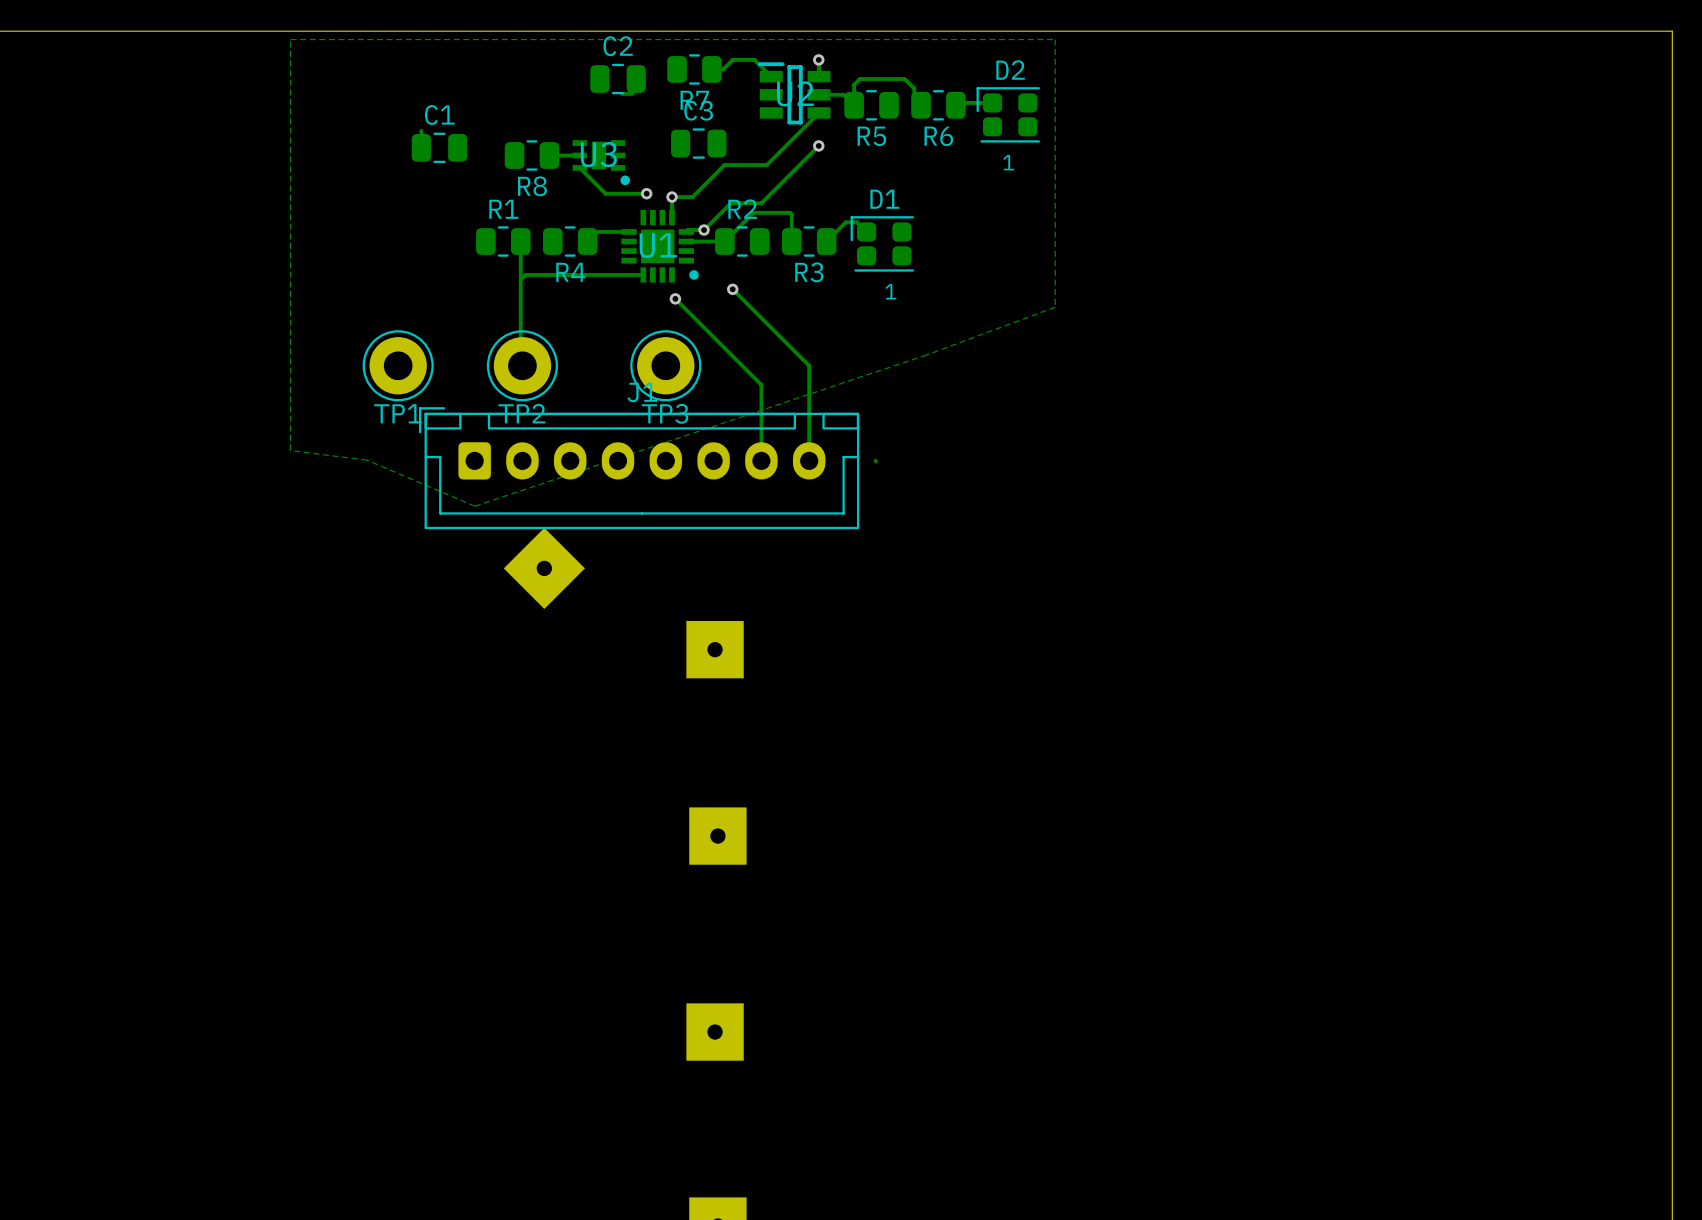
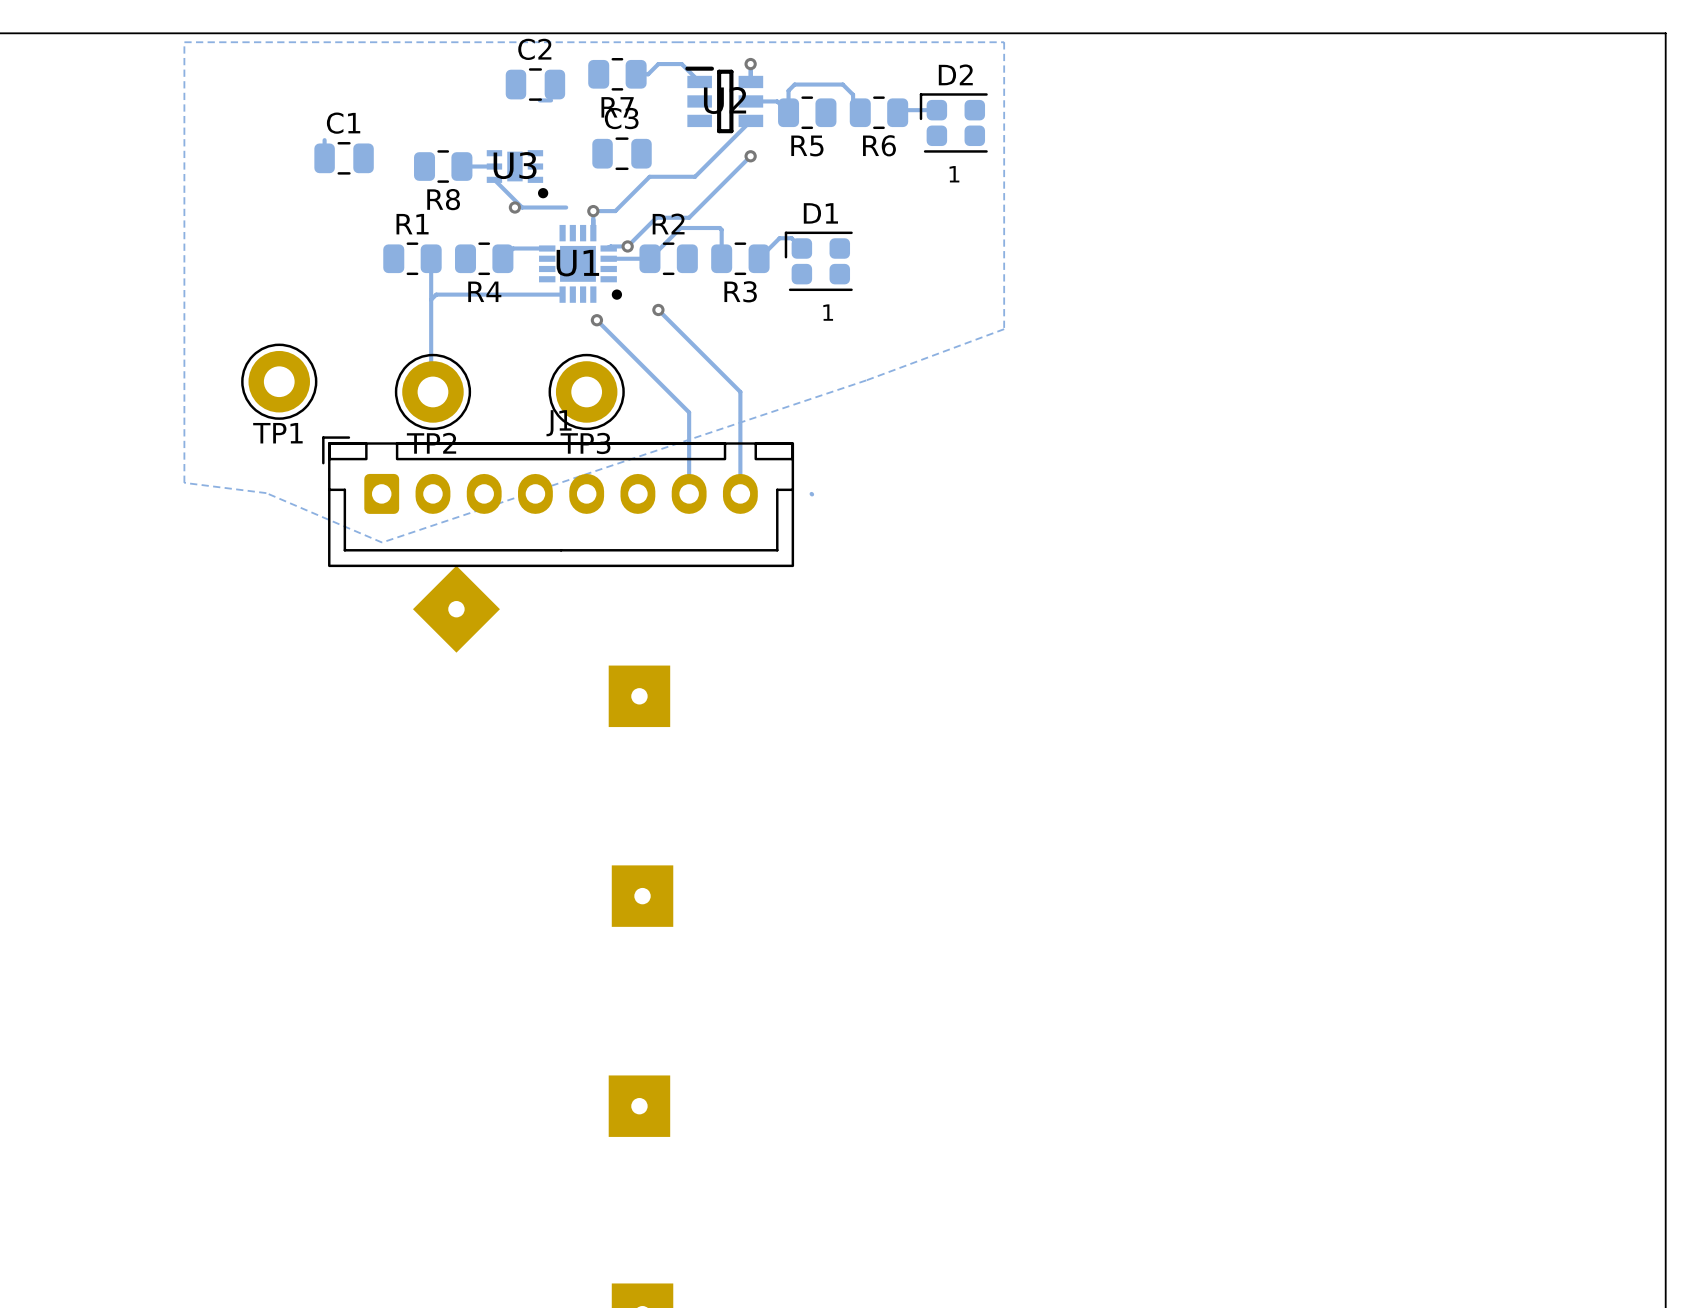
via position: (646, 193) -> (514, 207)
TP1 position: (398, 365) -> (279, 381)

